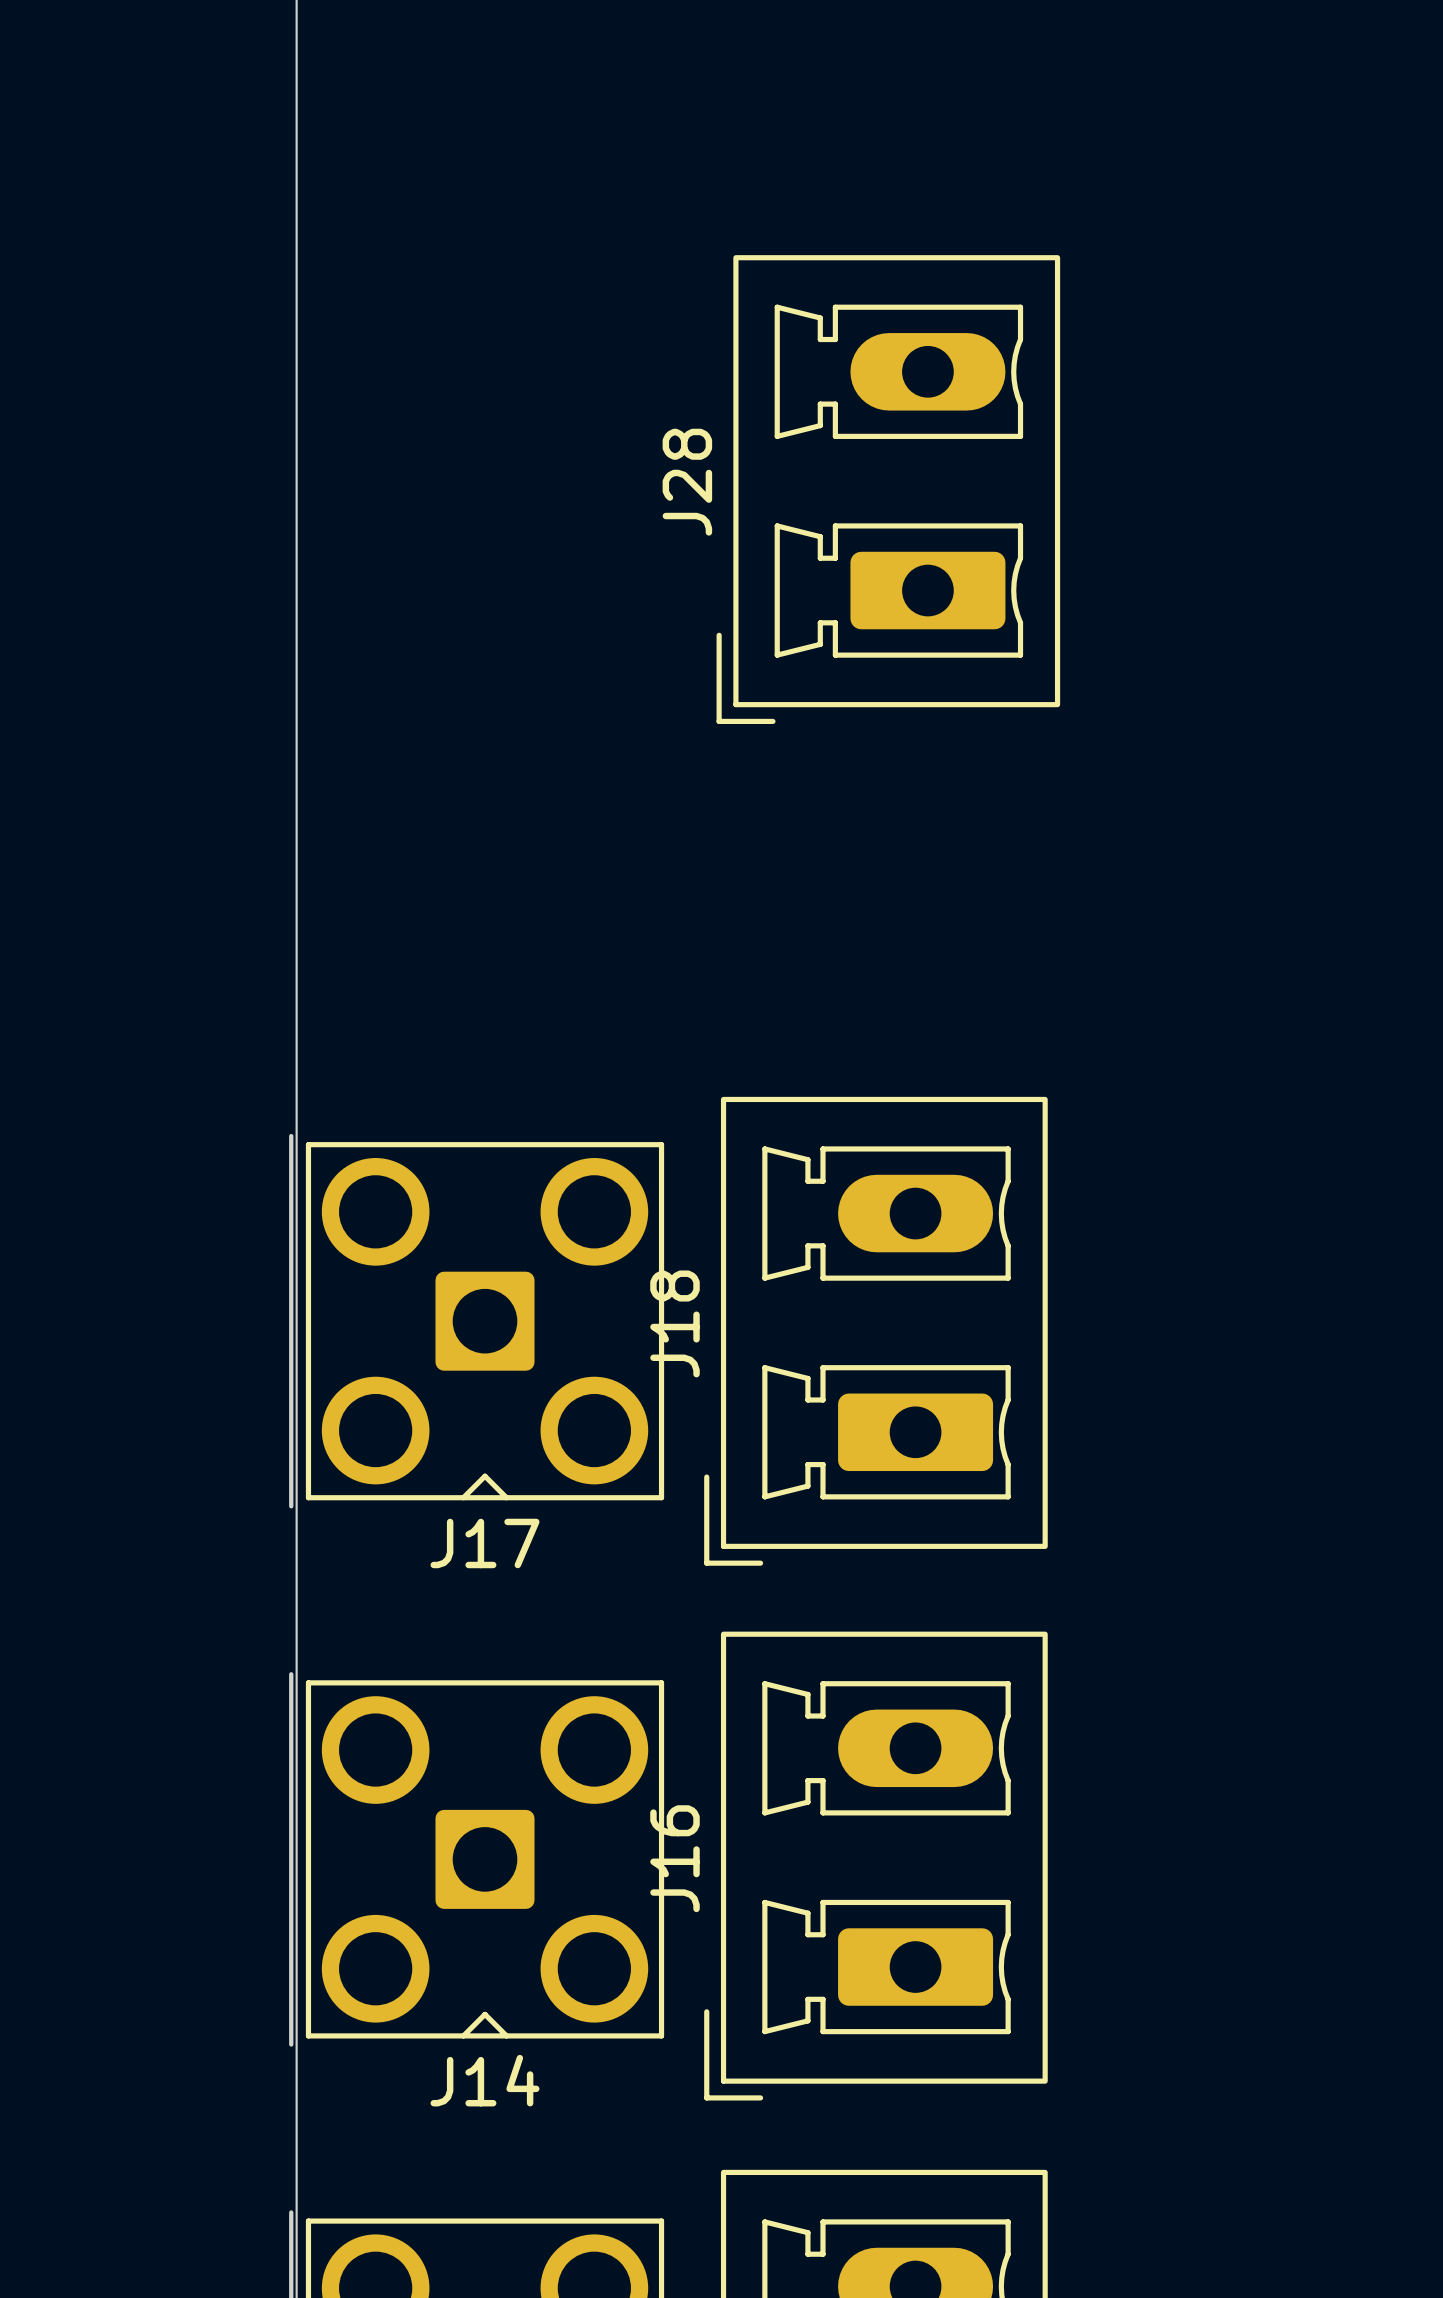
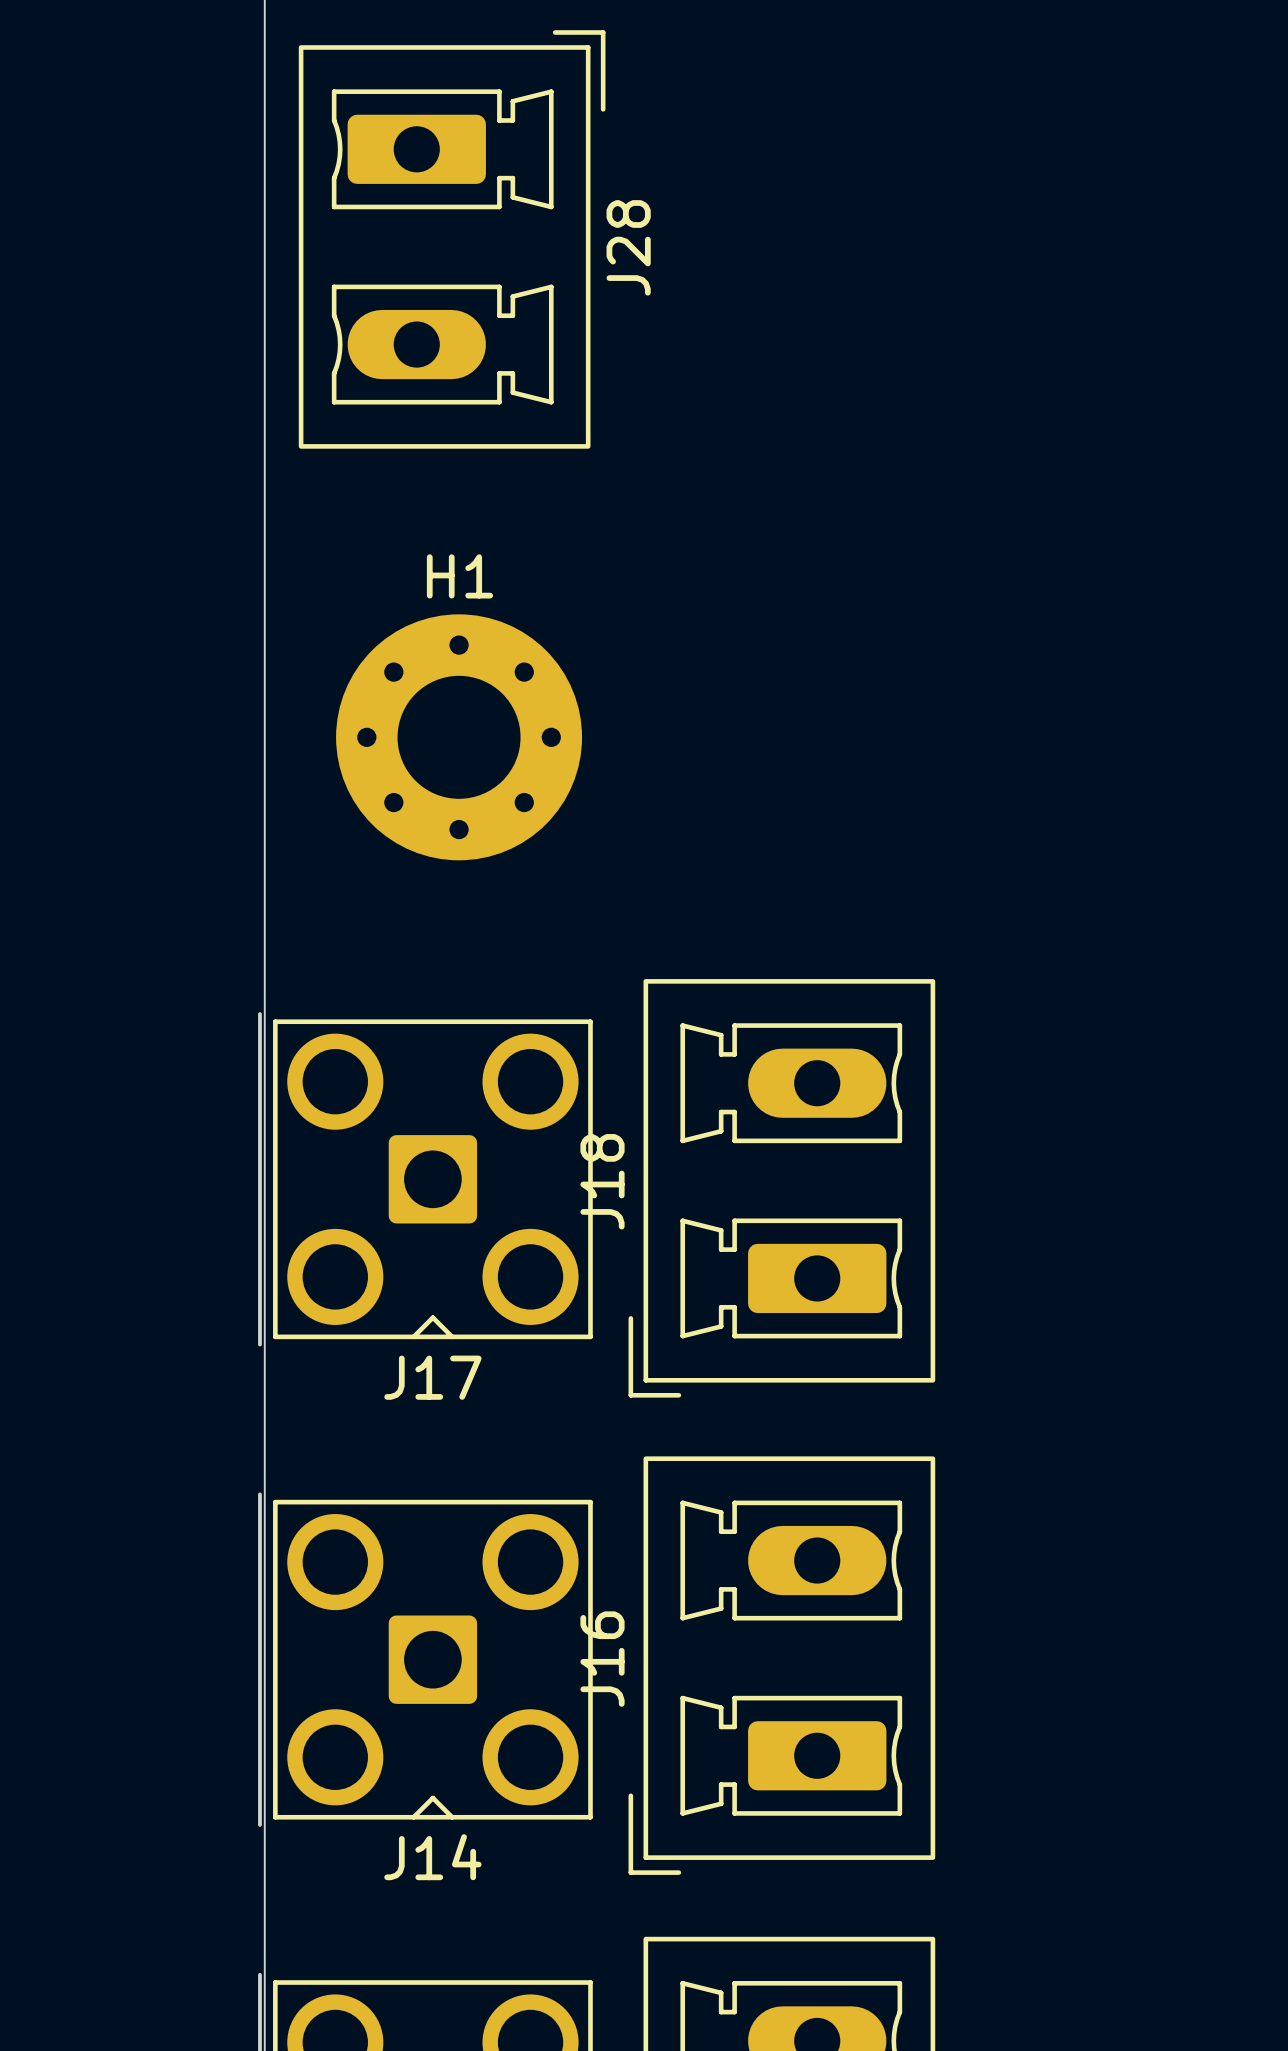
J28 footprint: [716, 255, 1061, 725] -> [298, 30, 606, 449]
J28 name position: J28 (687, 482) -> J28 (628, 247)
H1: none -> (459, 737)

